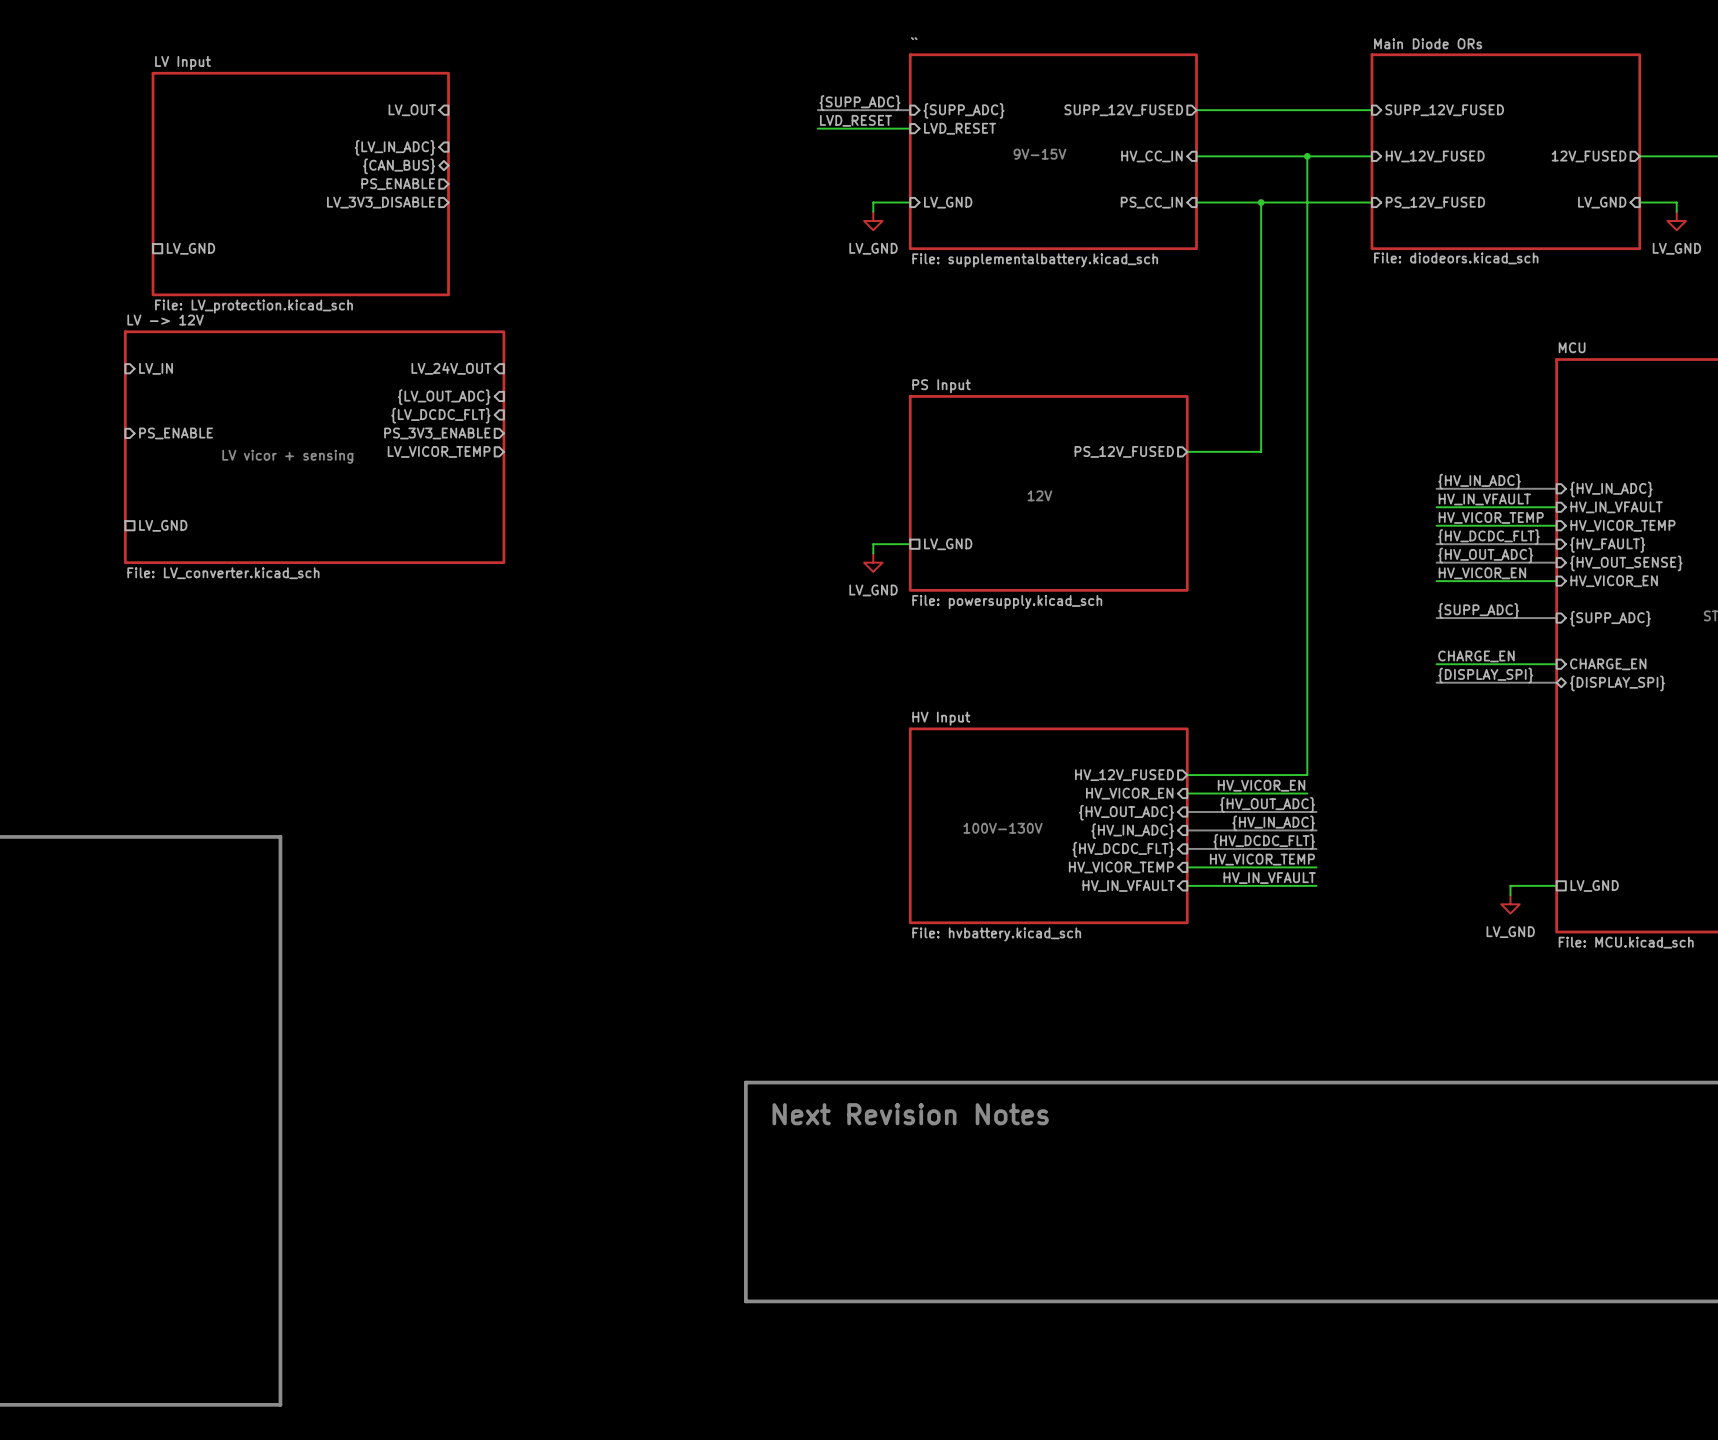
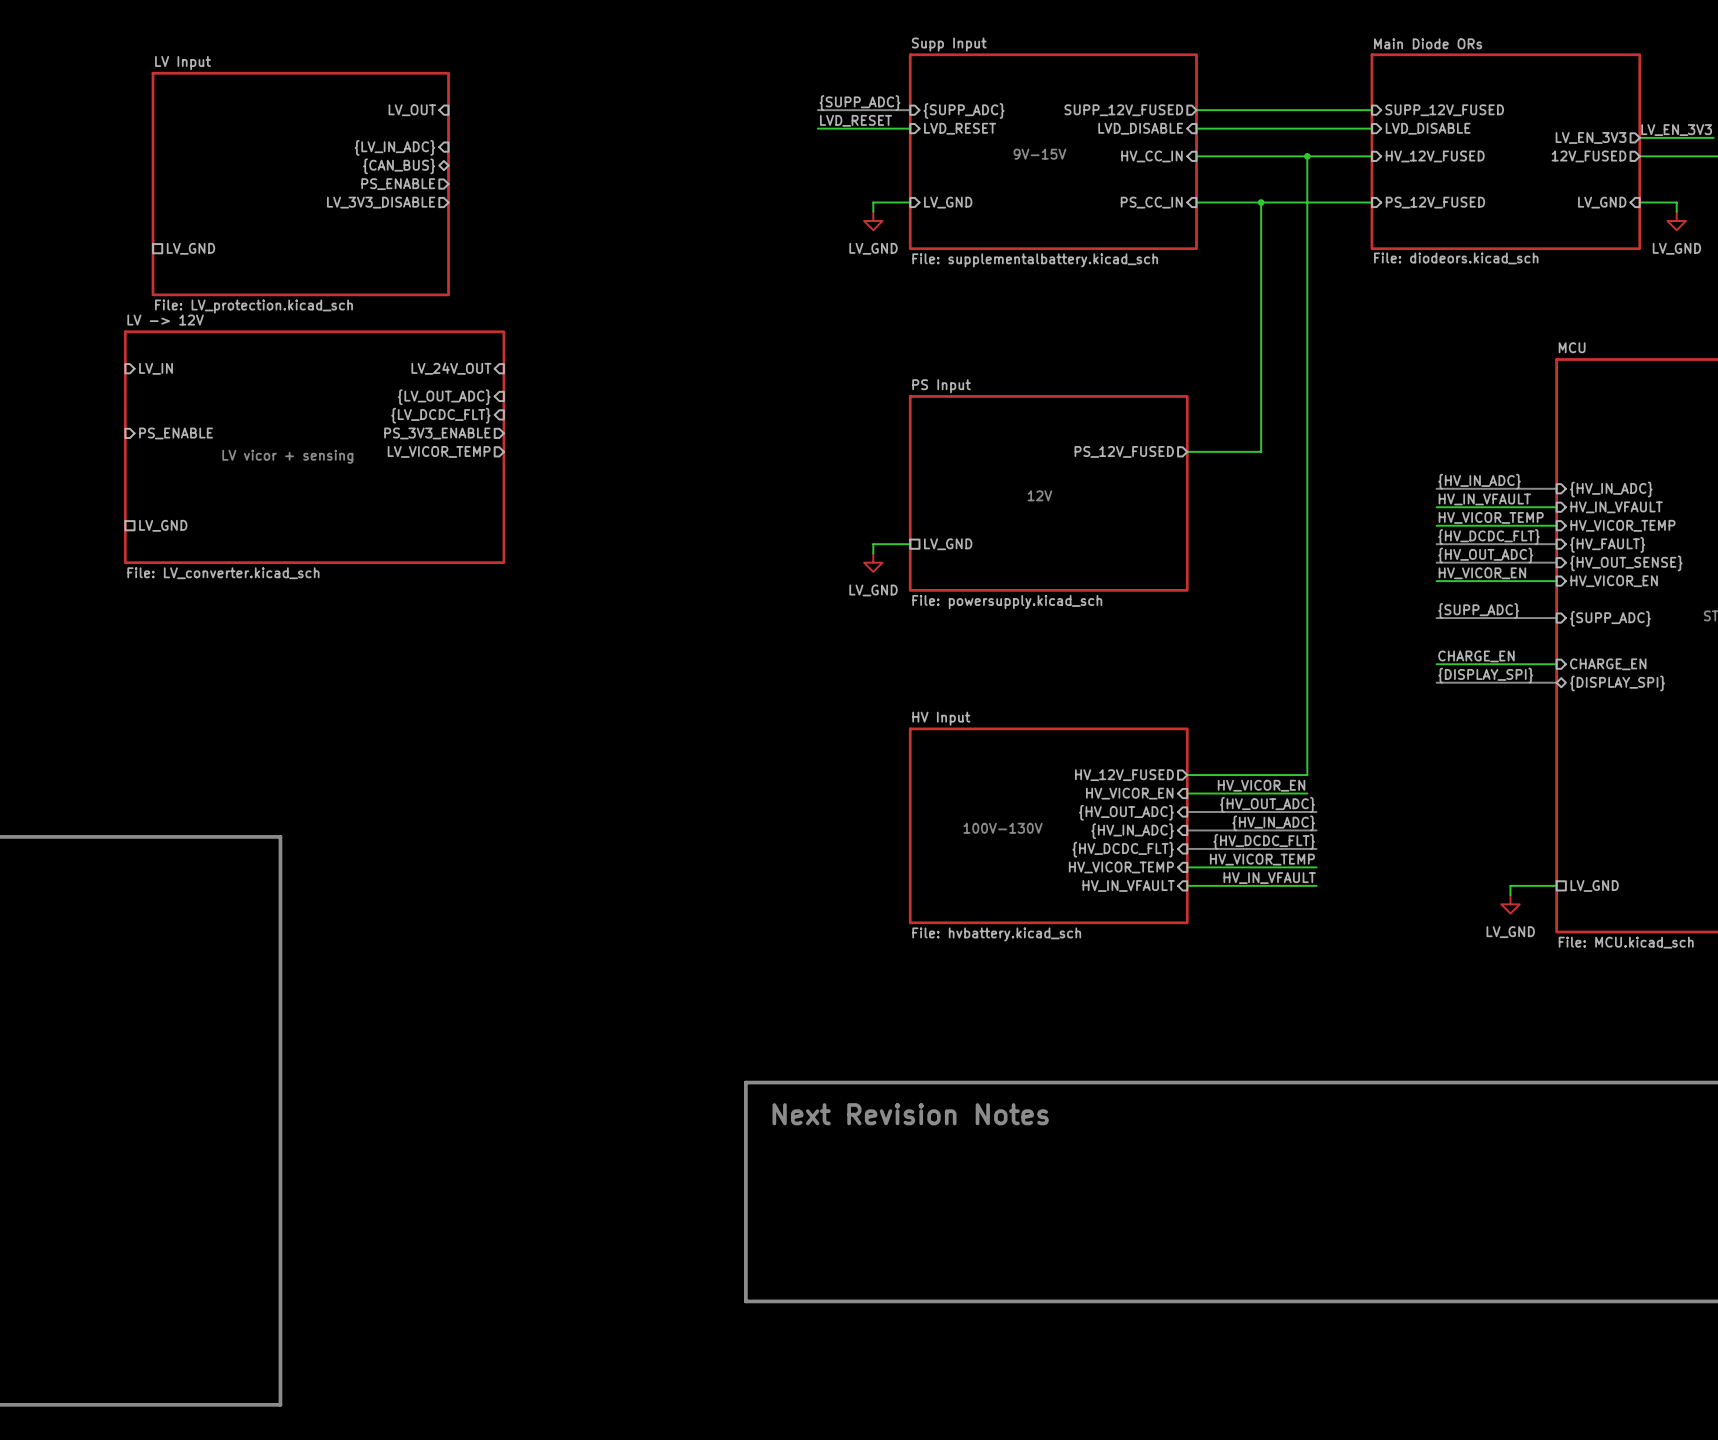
sheet Supp Input name: `` (914, 38) -> Supp Input (949, 44)
sheet pin: none -> LVD_DISABLE (1140, 128)
wire: none -> (1196, 128) (1371, 128)
sheet pin: none -> LVD_DISABLE (1428, 128)
label: none -> LV_EN_3V3 (1676, 130)
sheet pin: none -> LV_EN_3V3 (1591, 137)
wire: none -> (1639, 137) (1713, 137)

